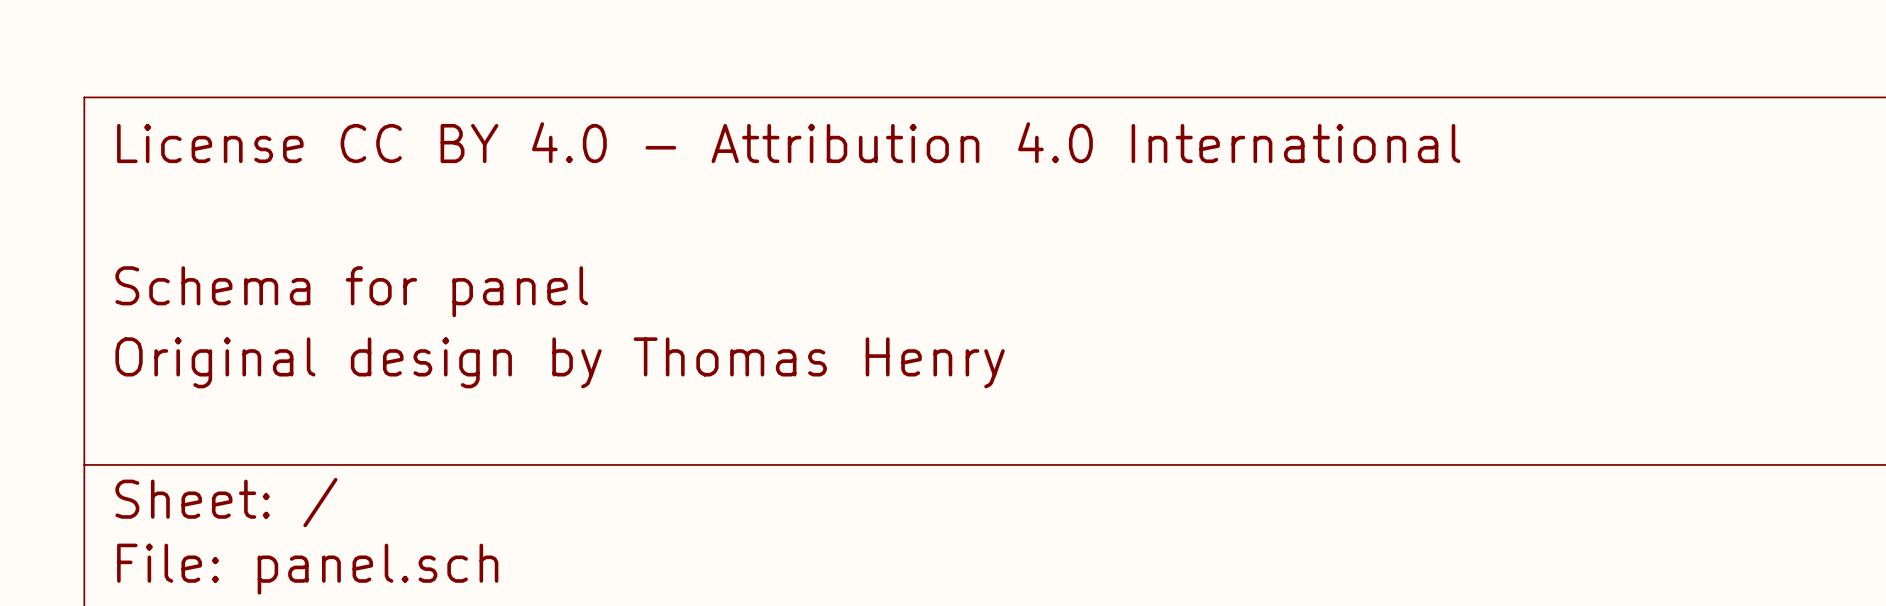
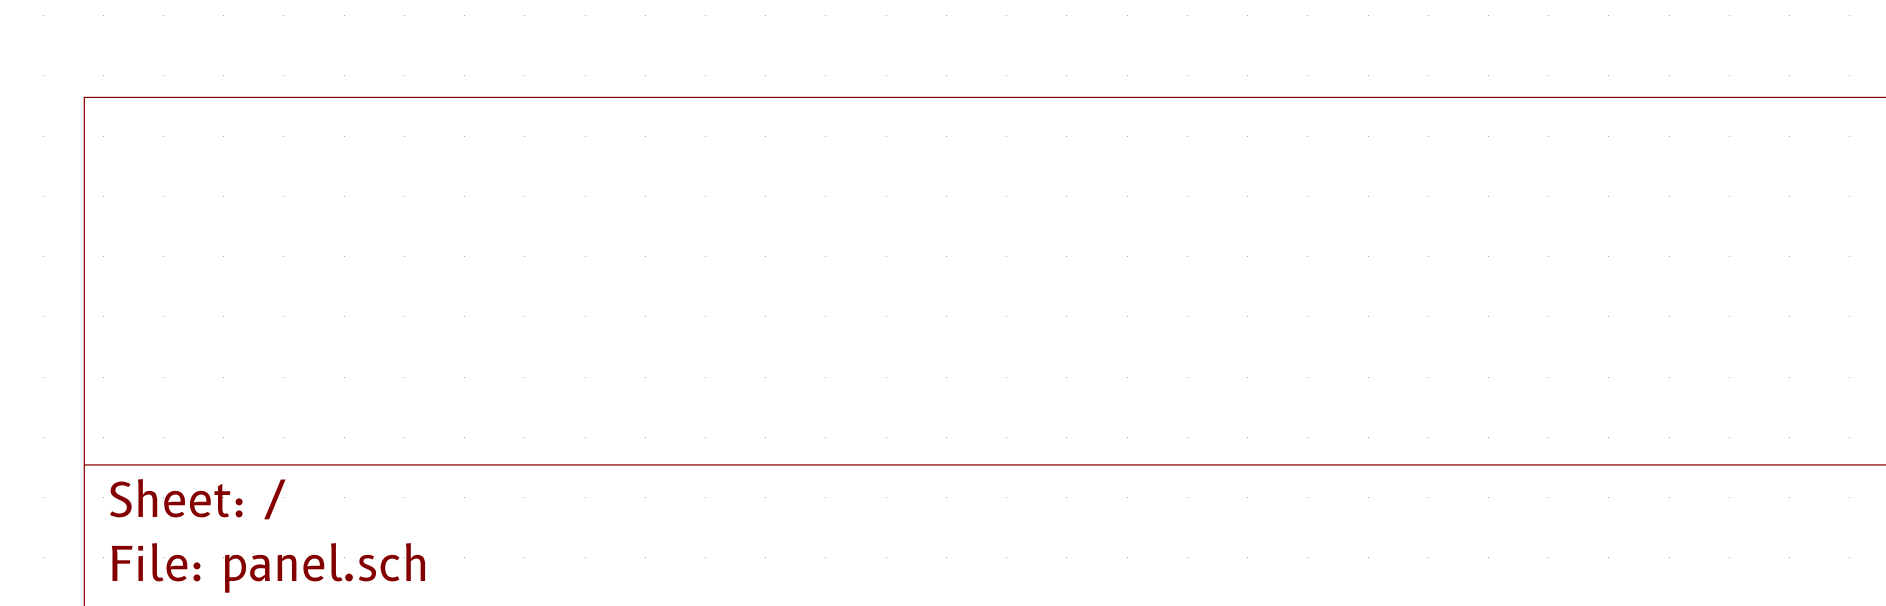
title block: License CC BY 4.0 - Attribution 4.0 International (788, 142) -> none
title block: Schema for panel (351, 291) -> none
title block: Original design by Thomas Henry (560, 362) -> none

